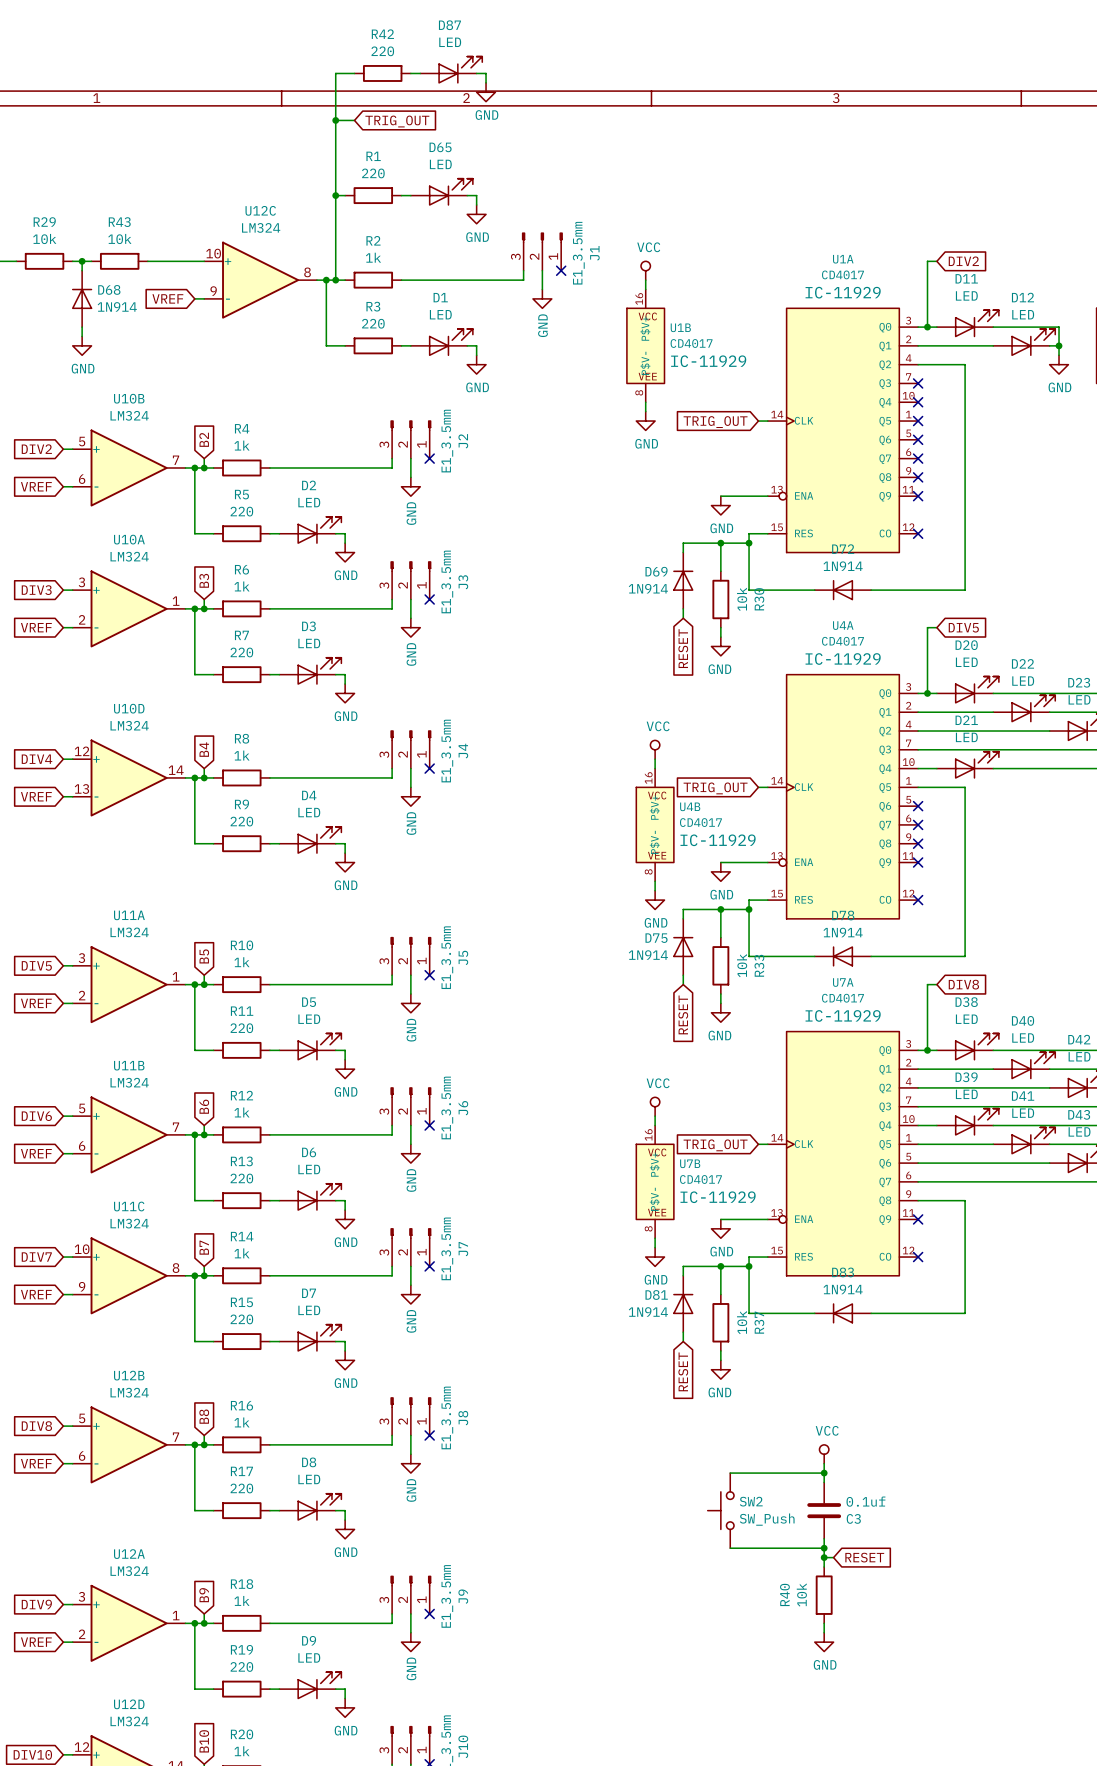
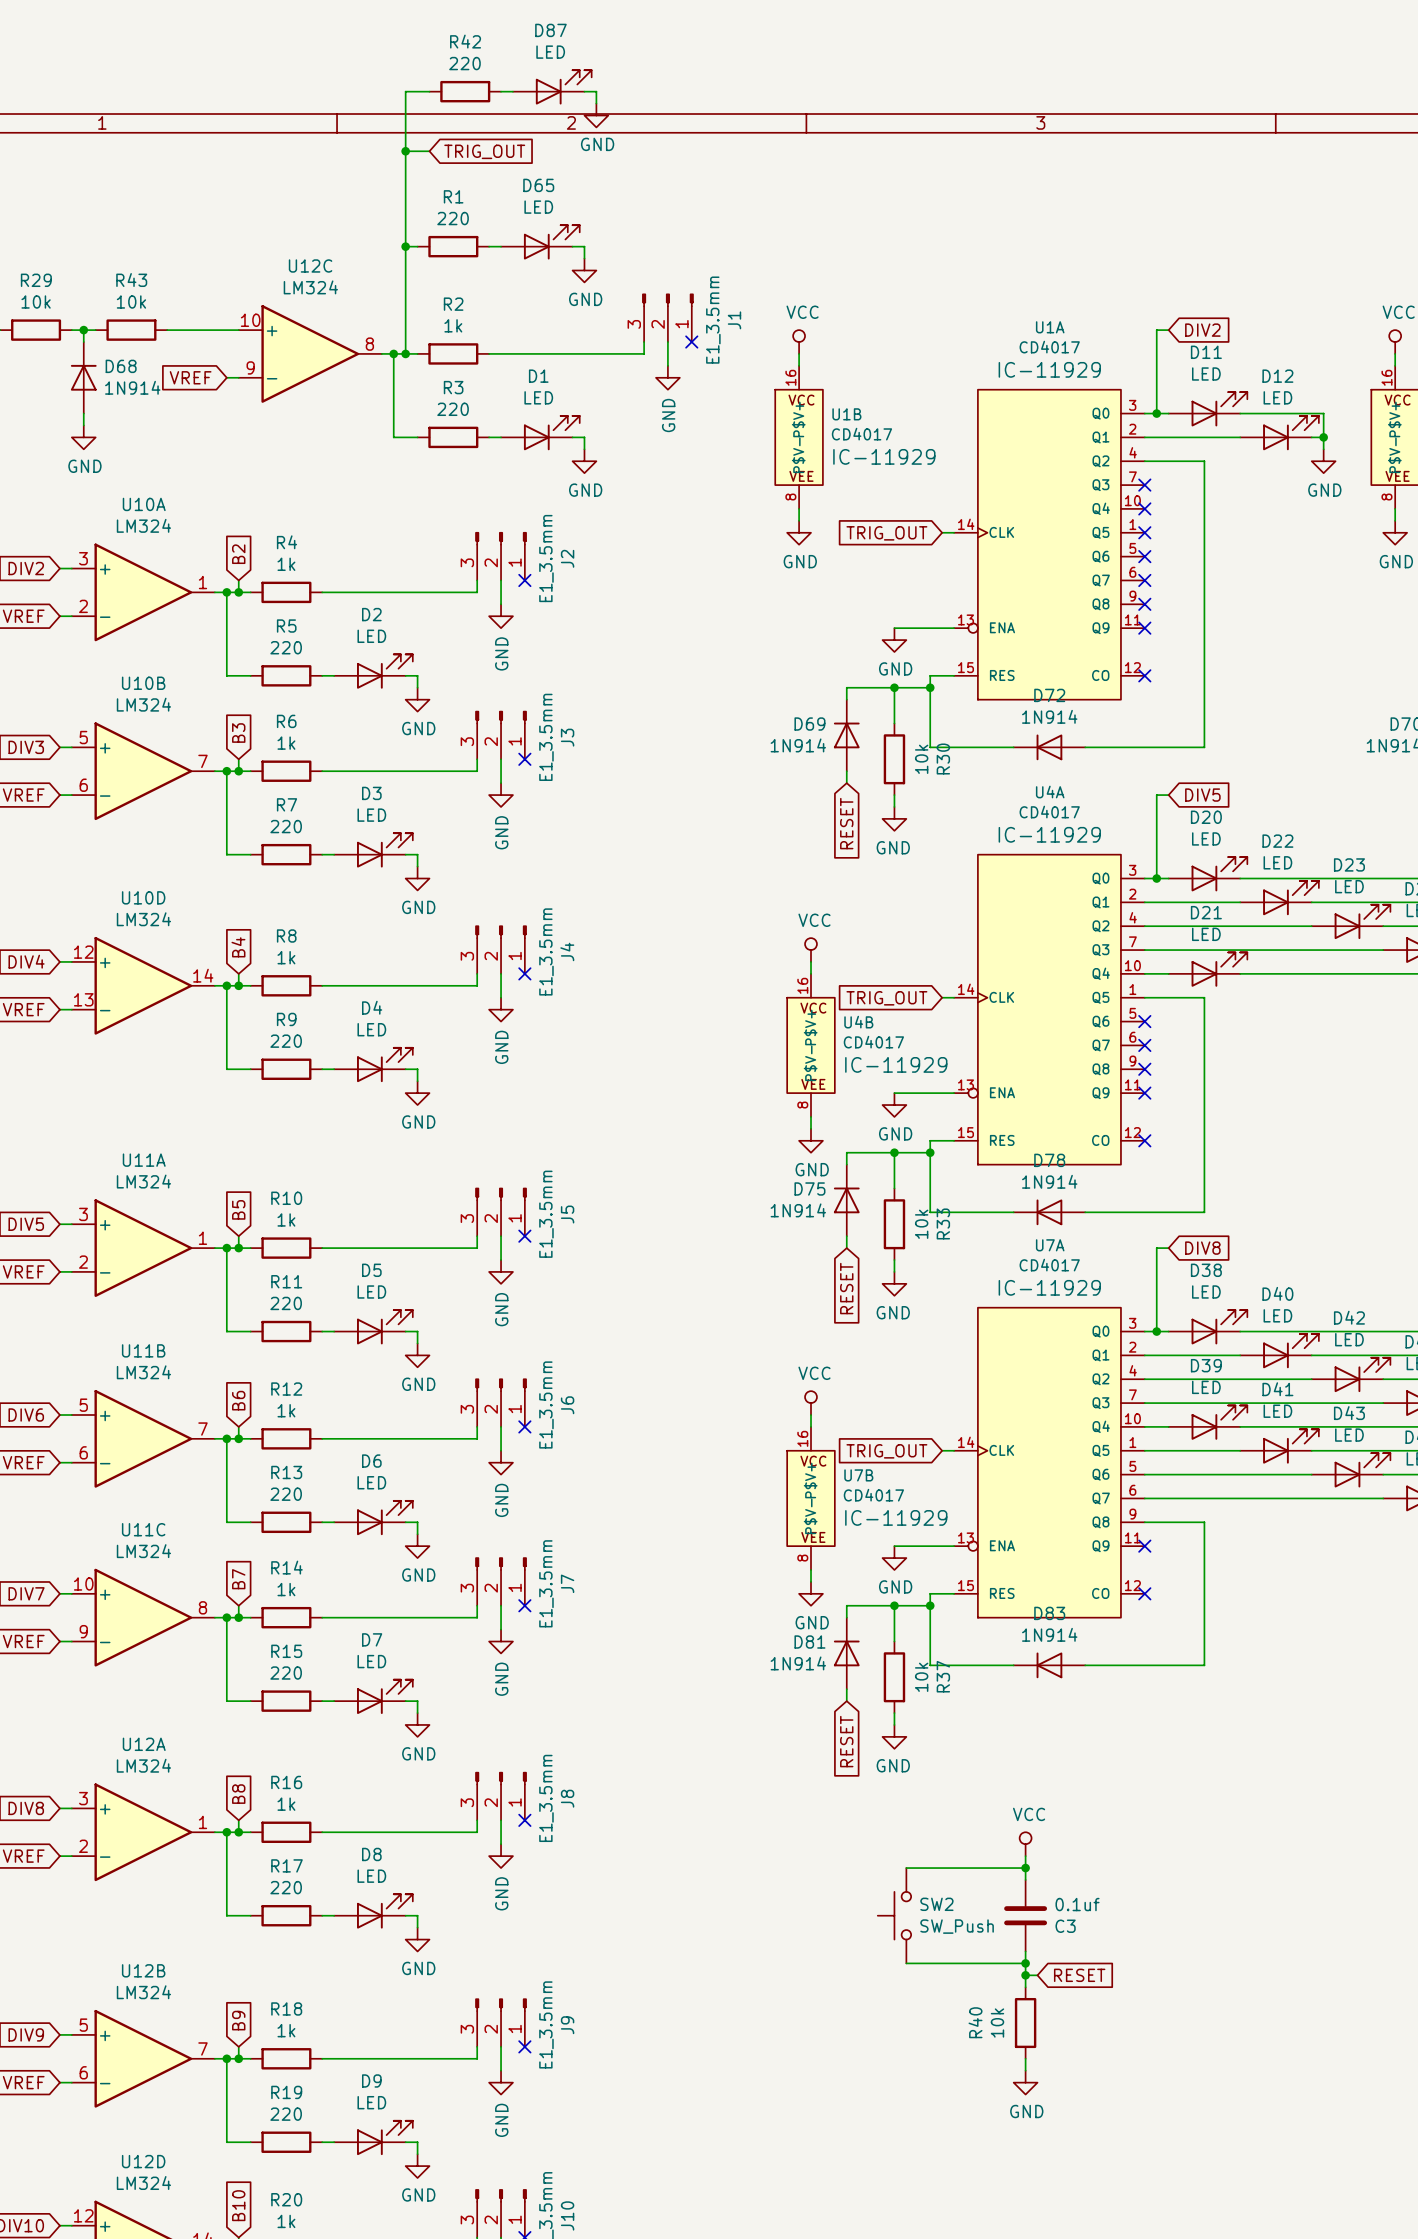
U10B position: (129, 467) -> (143, 771)
U10A position: (129, 608) -> (143, 592)
U12B position: (129, 1444) -> (143, 2058)
U12A position: (129, 1623) -> (143, 1832)

